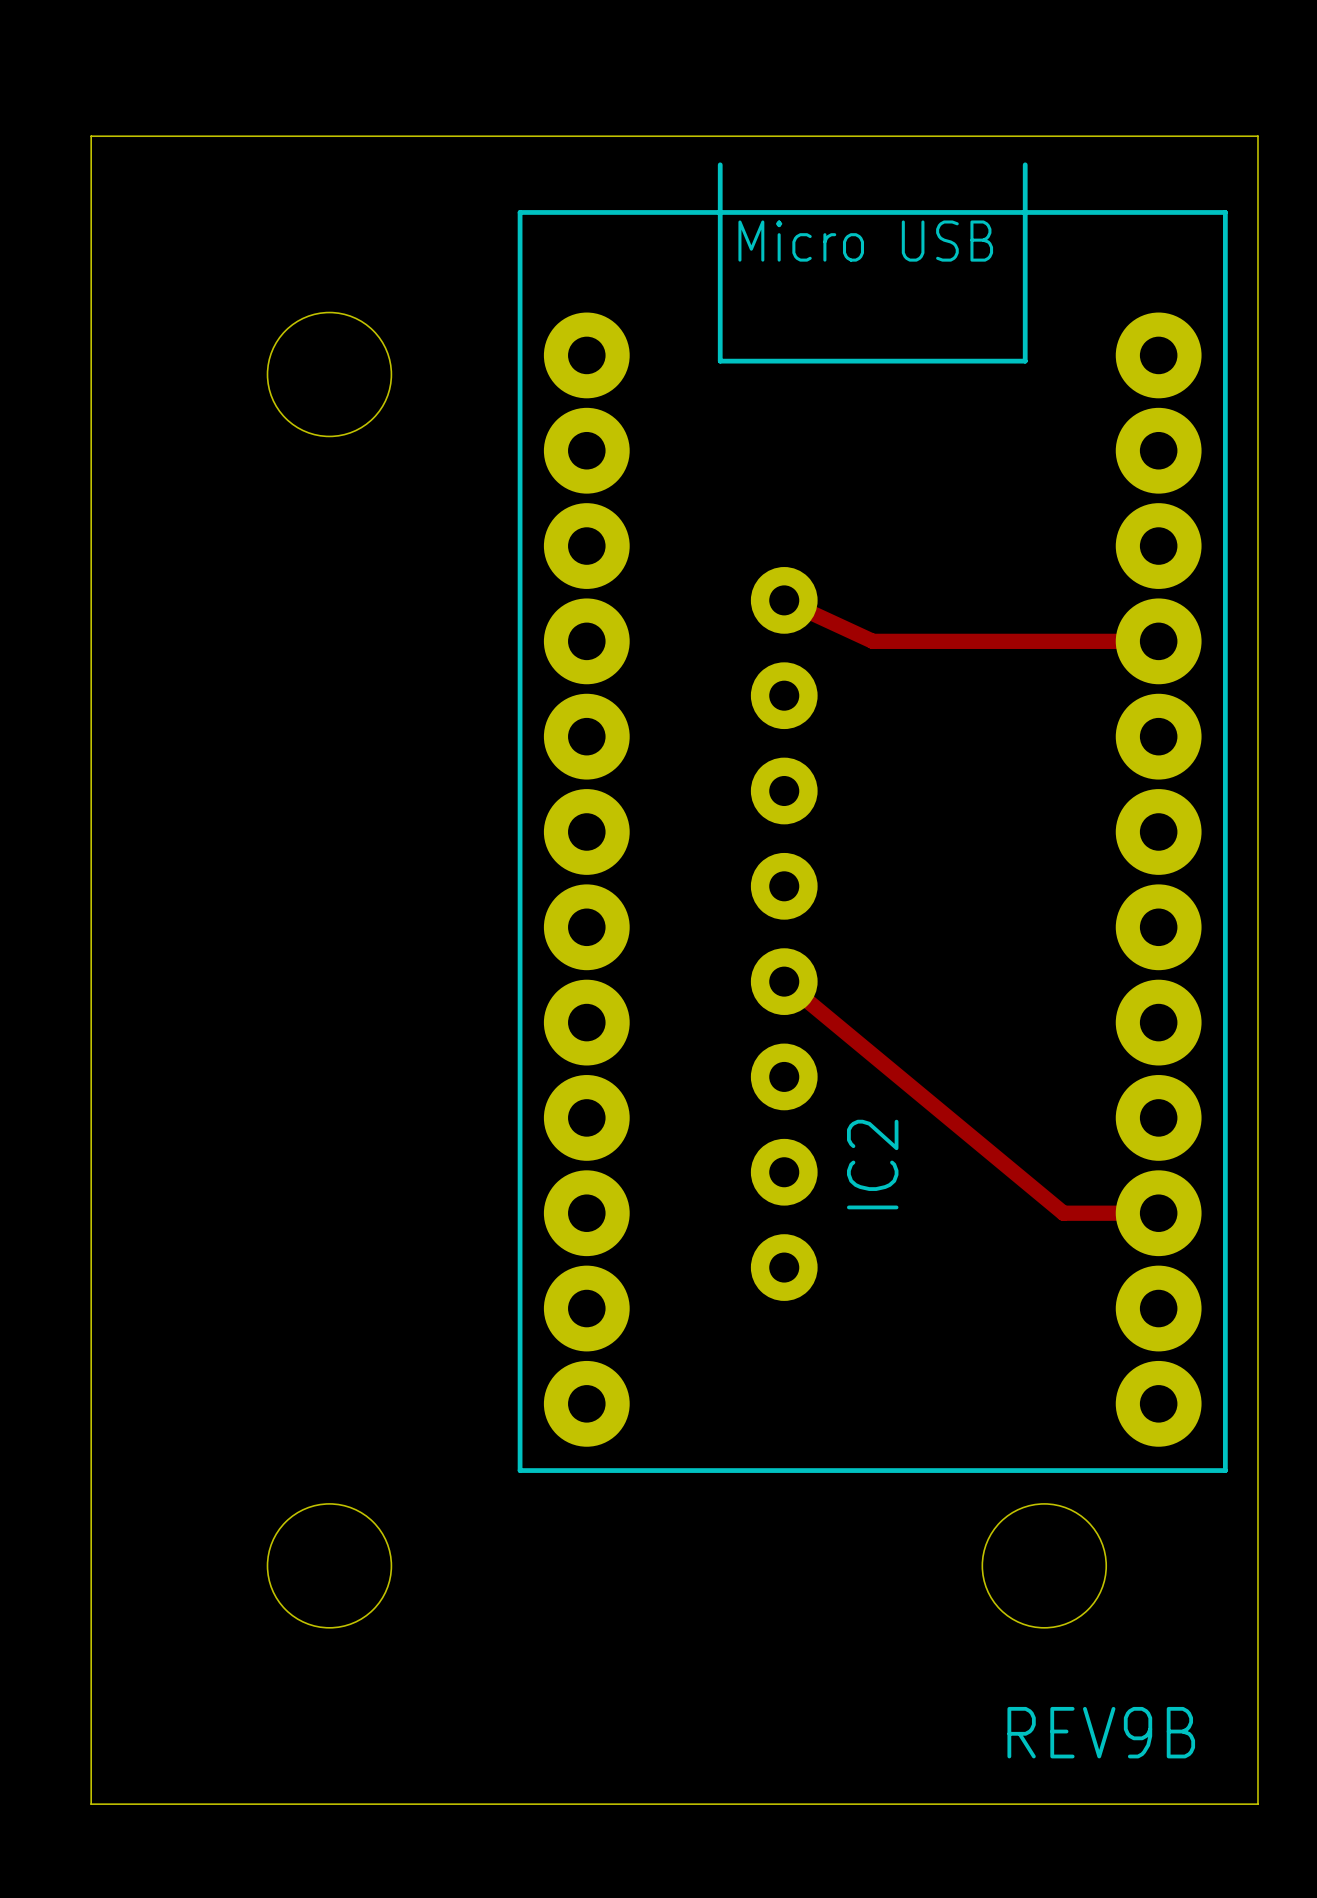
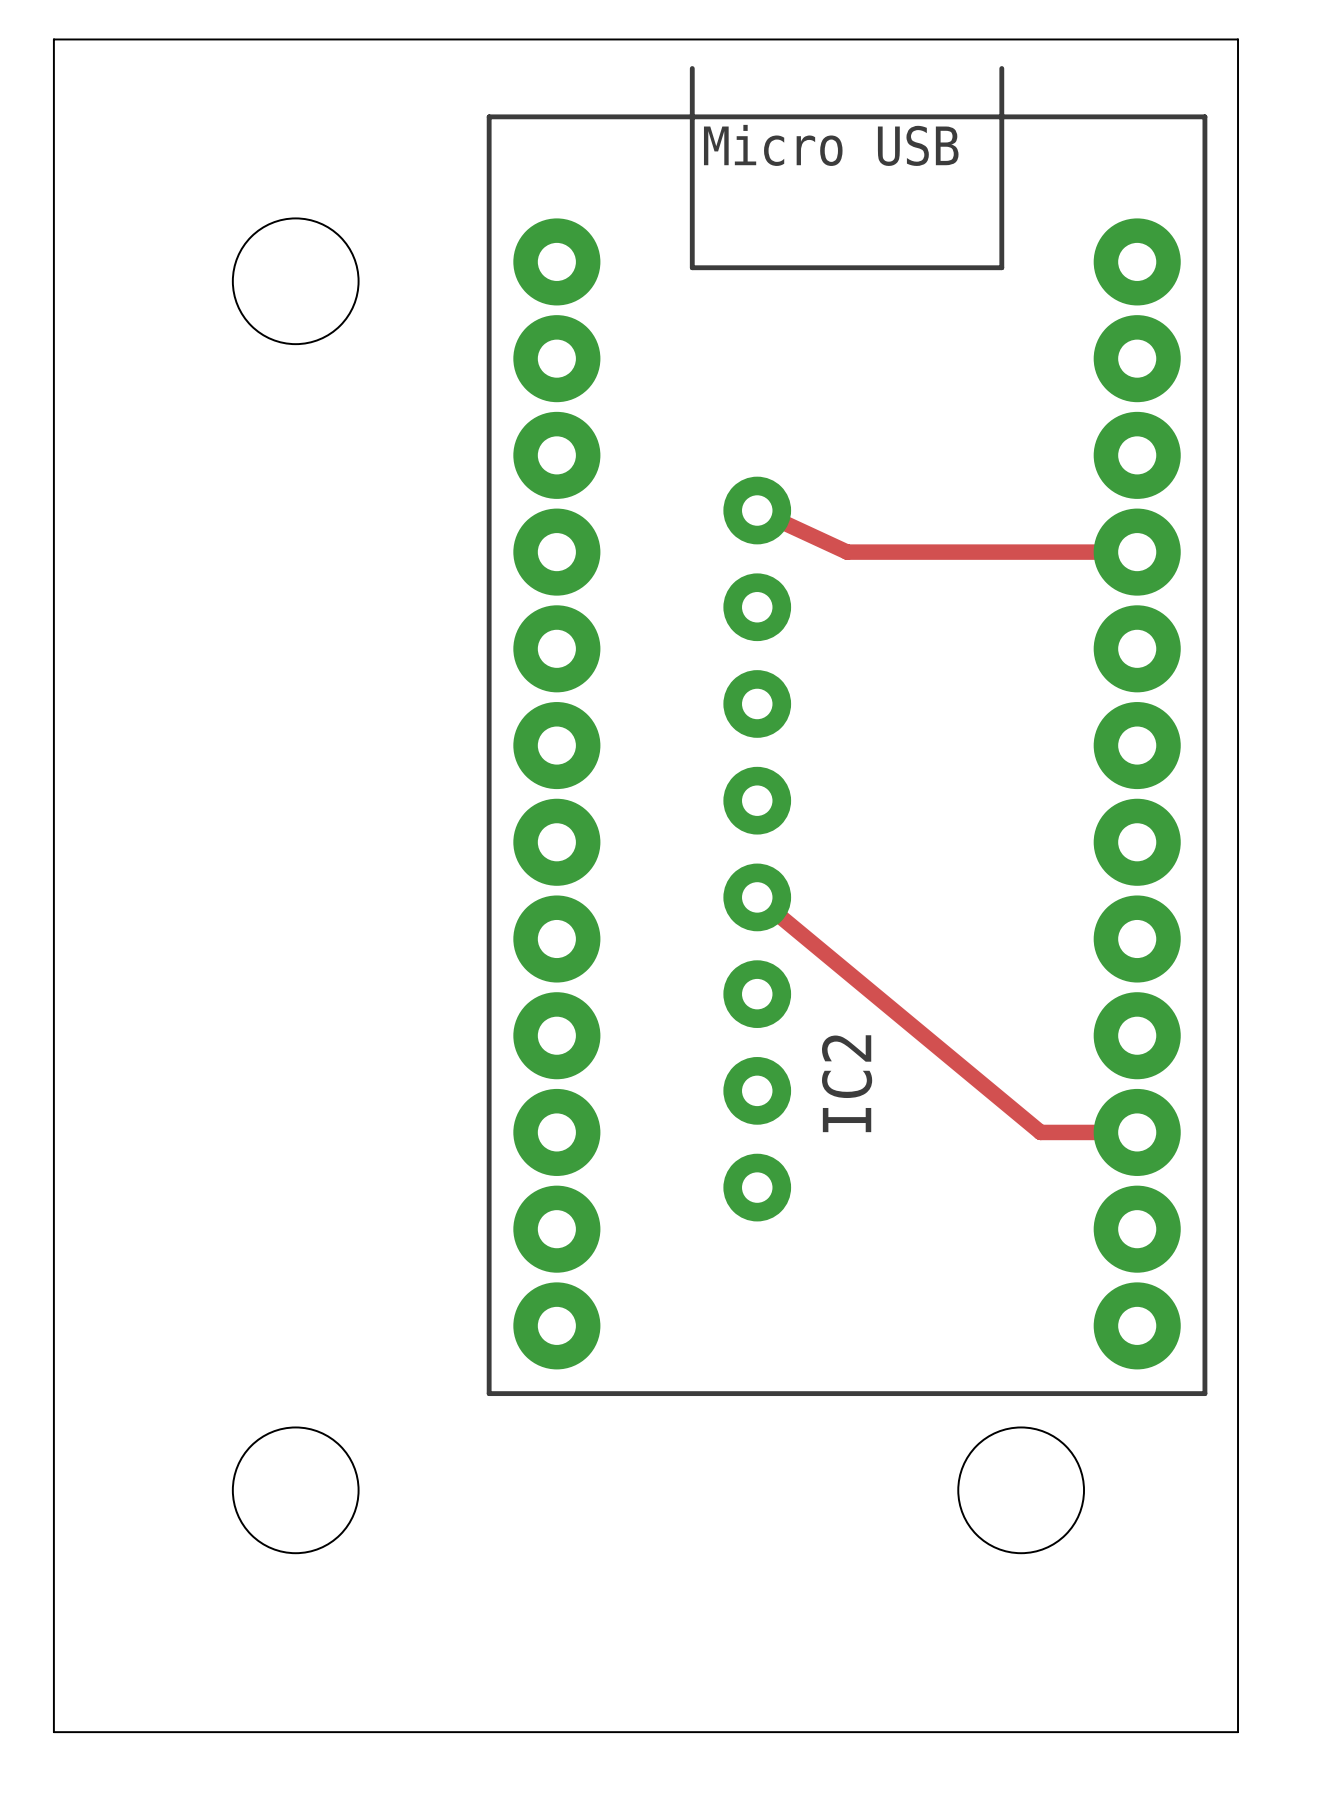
text: REV9B (1101, 1732) -> none

